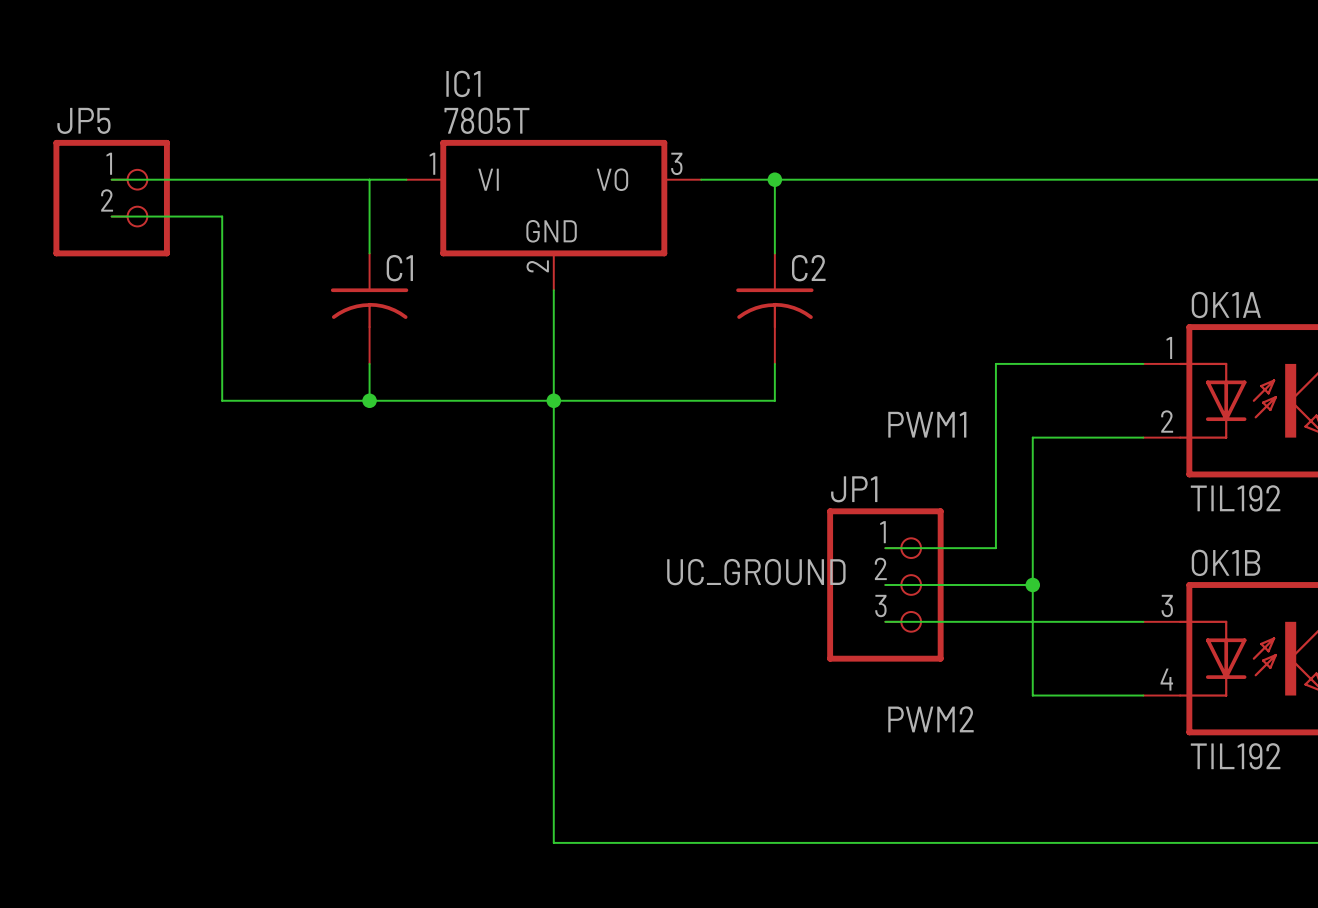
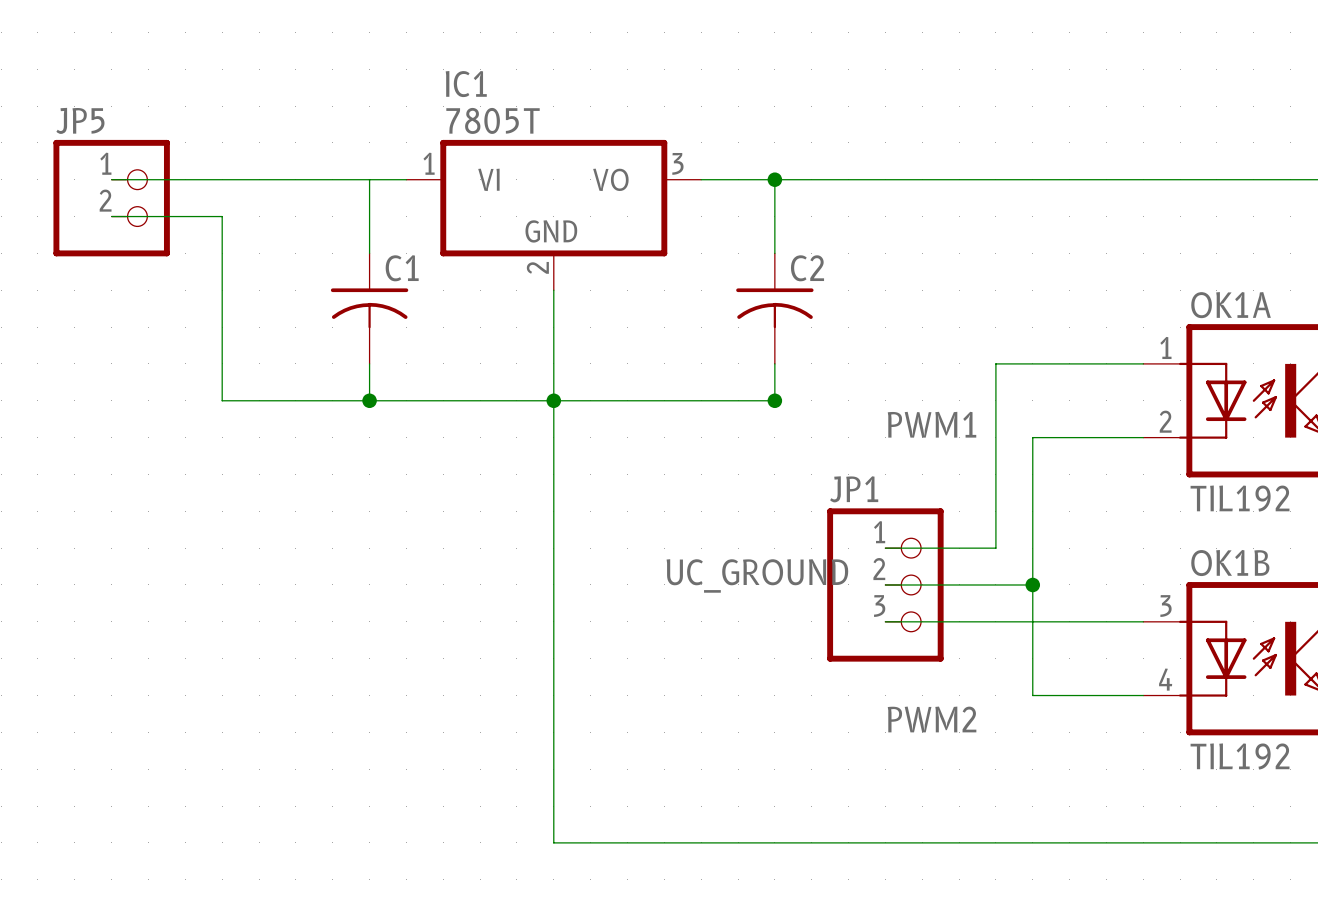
junction: none -> (774, 400)

